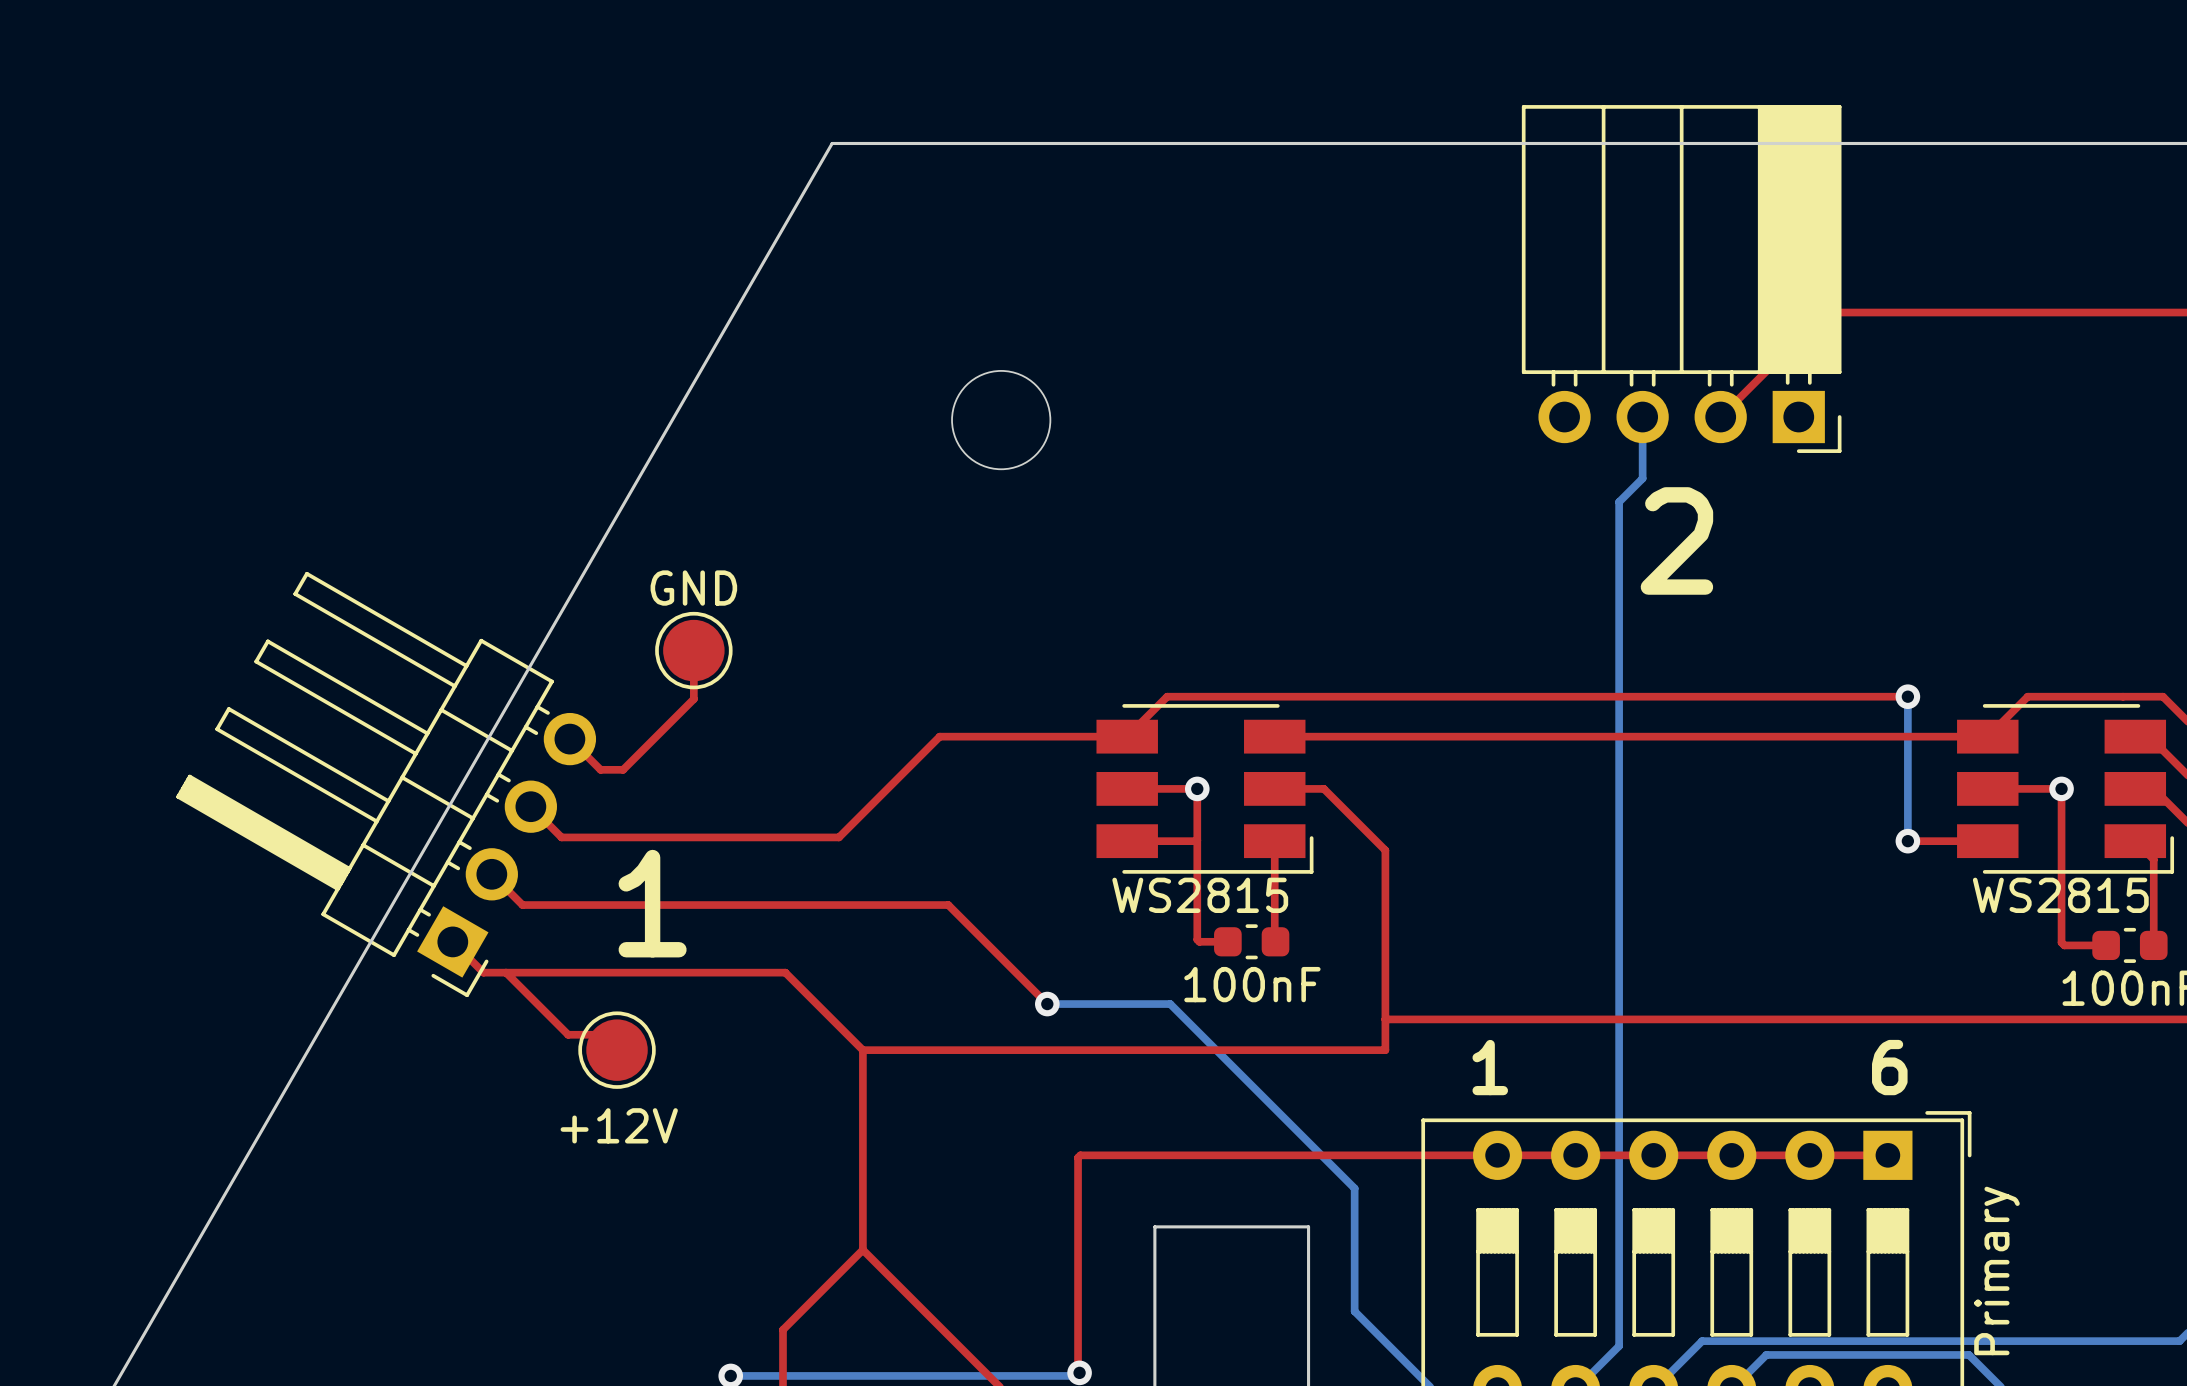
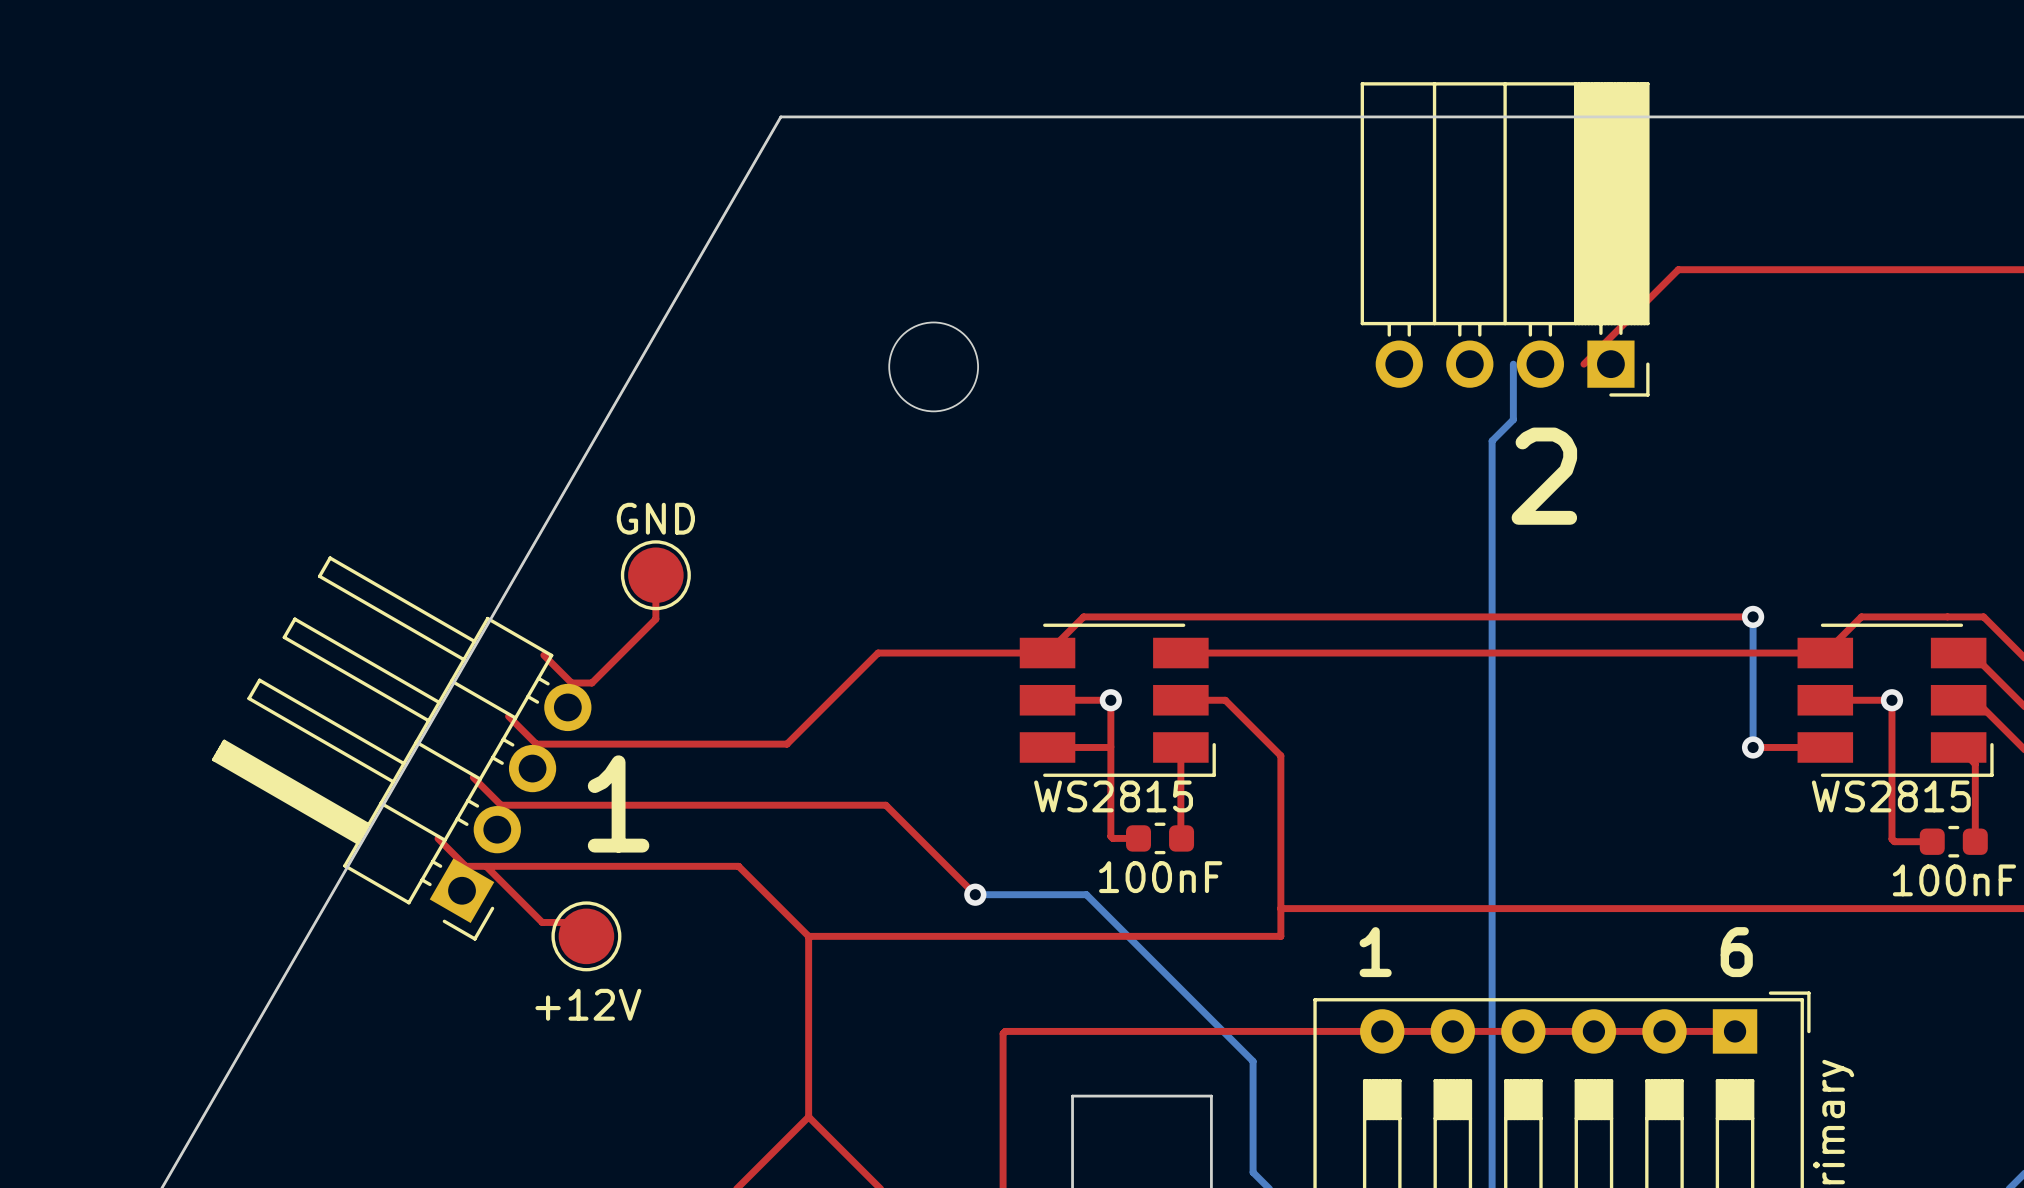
part position: (1681, 279) -> (1505, 239)
part position: (386, 784) -> (401, 748)

